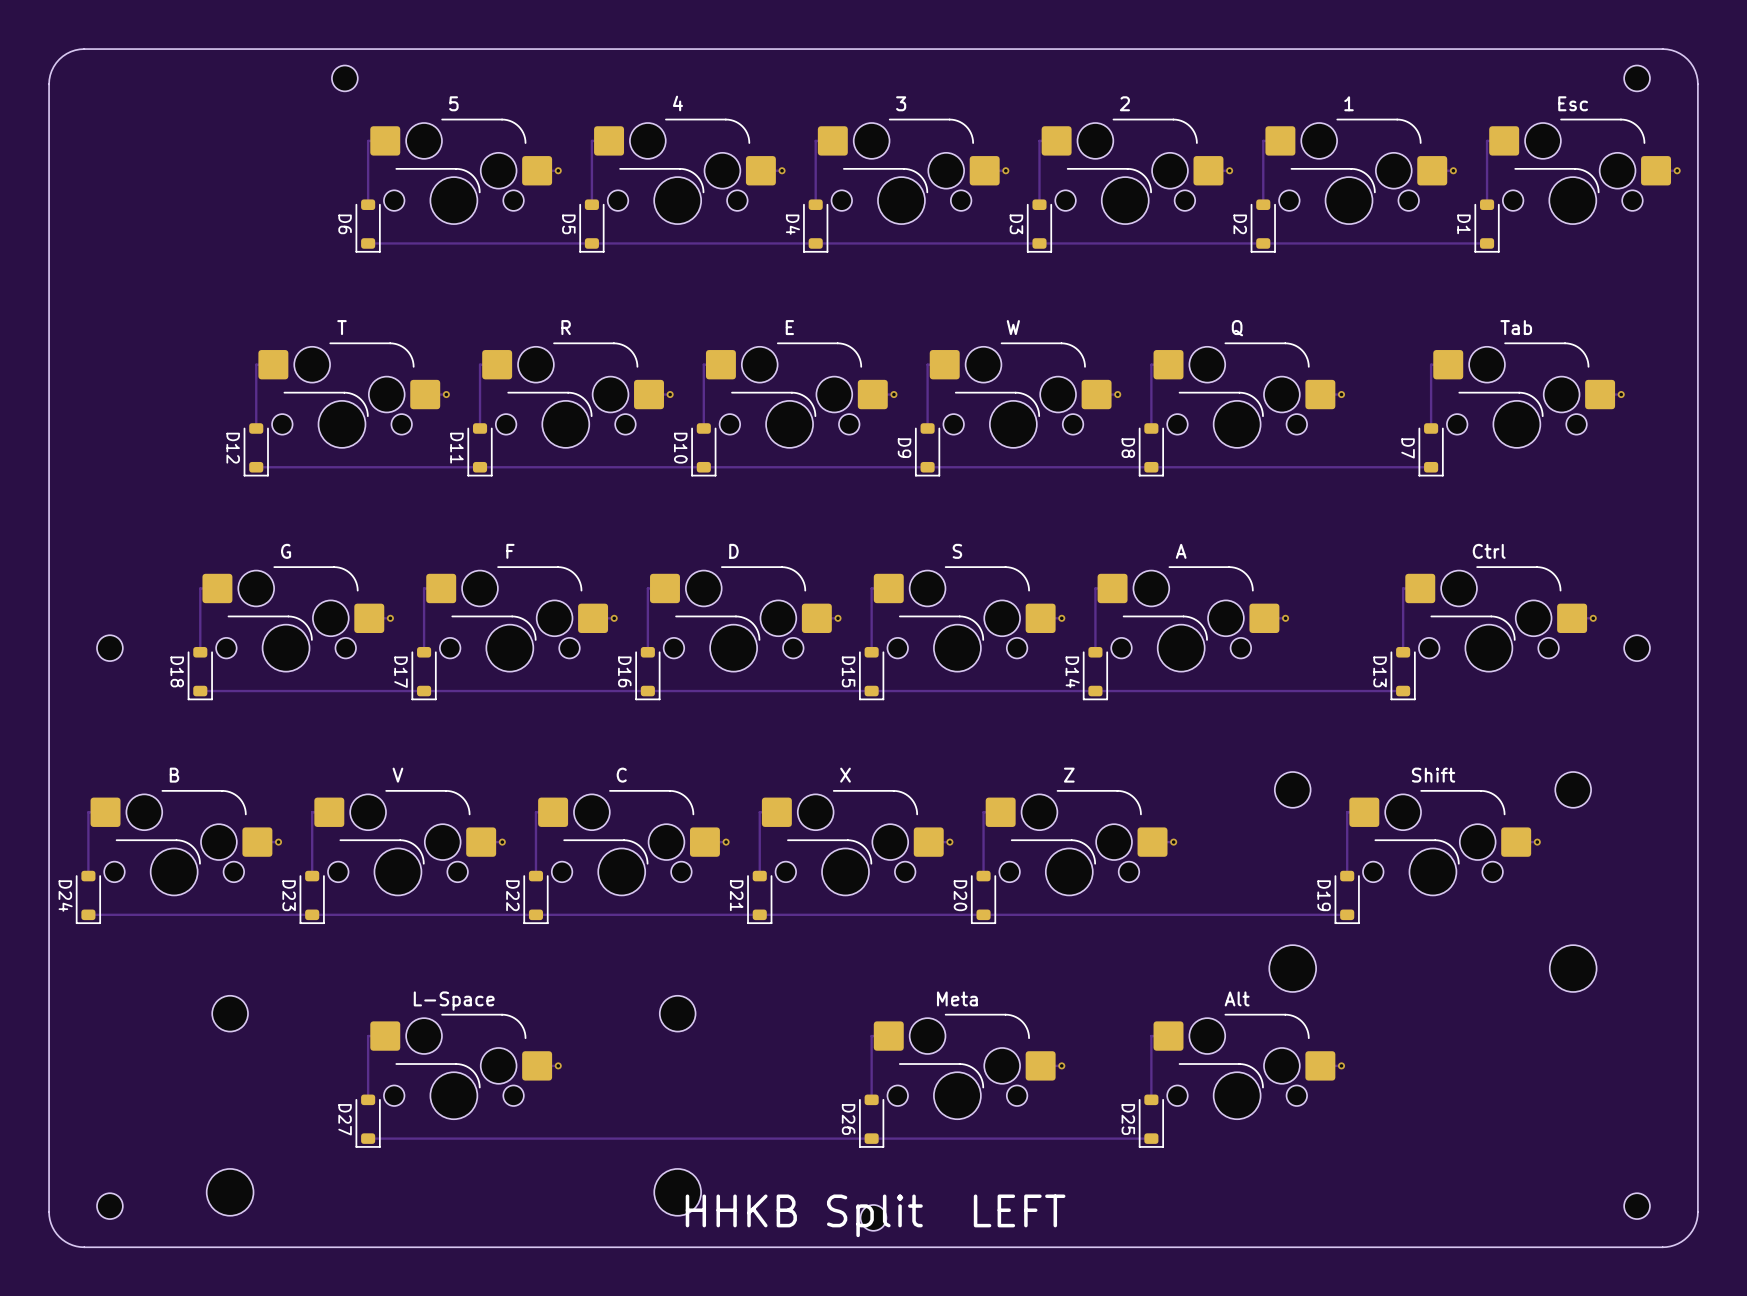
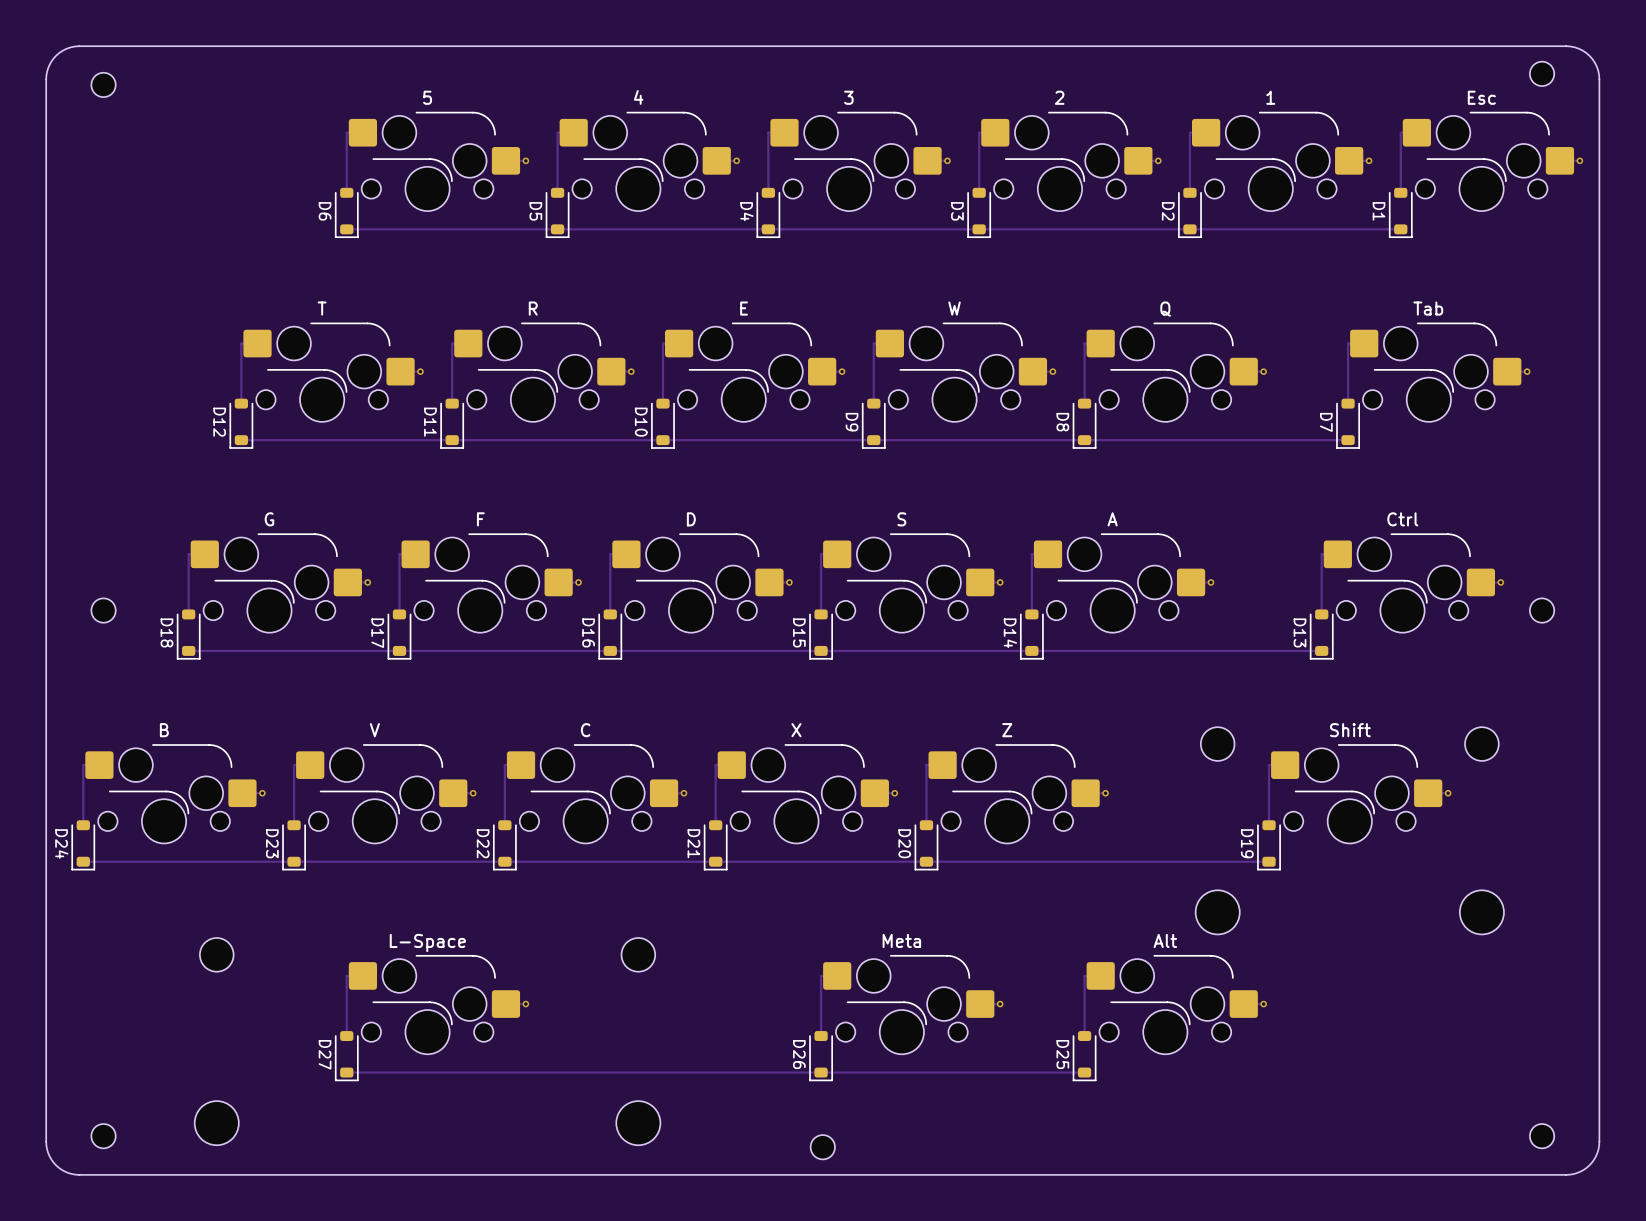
part position: (344, 78) -> (103, 84)
text: HHKB Split LEFT (875, 1215) -> none

